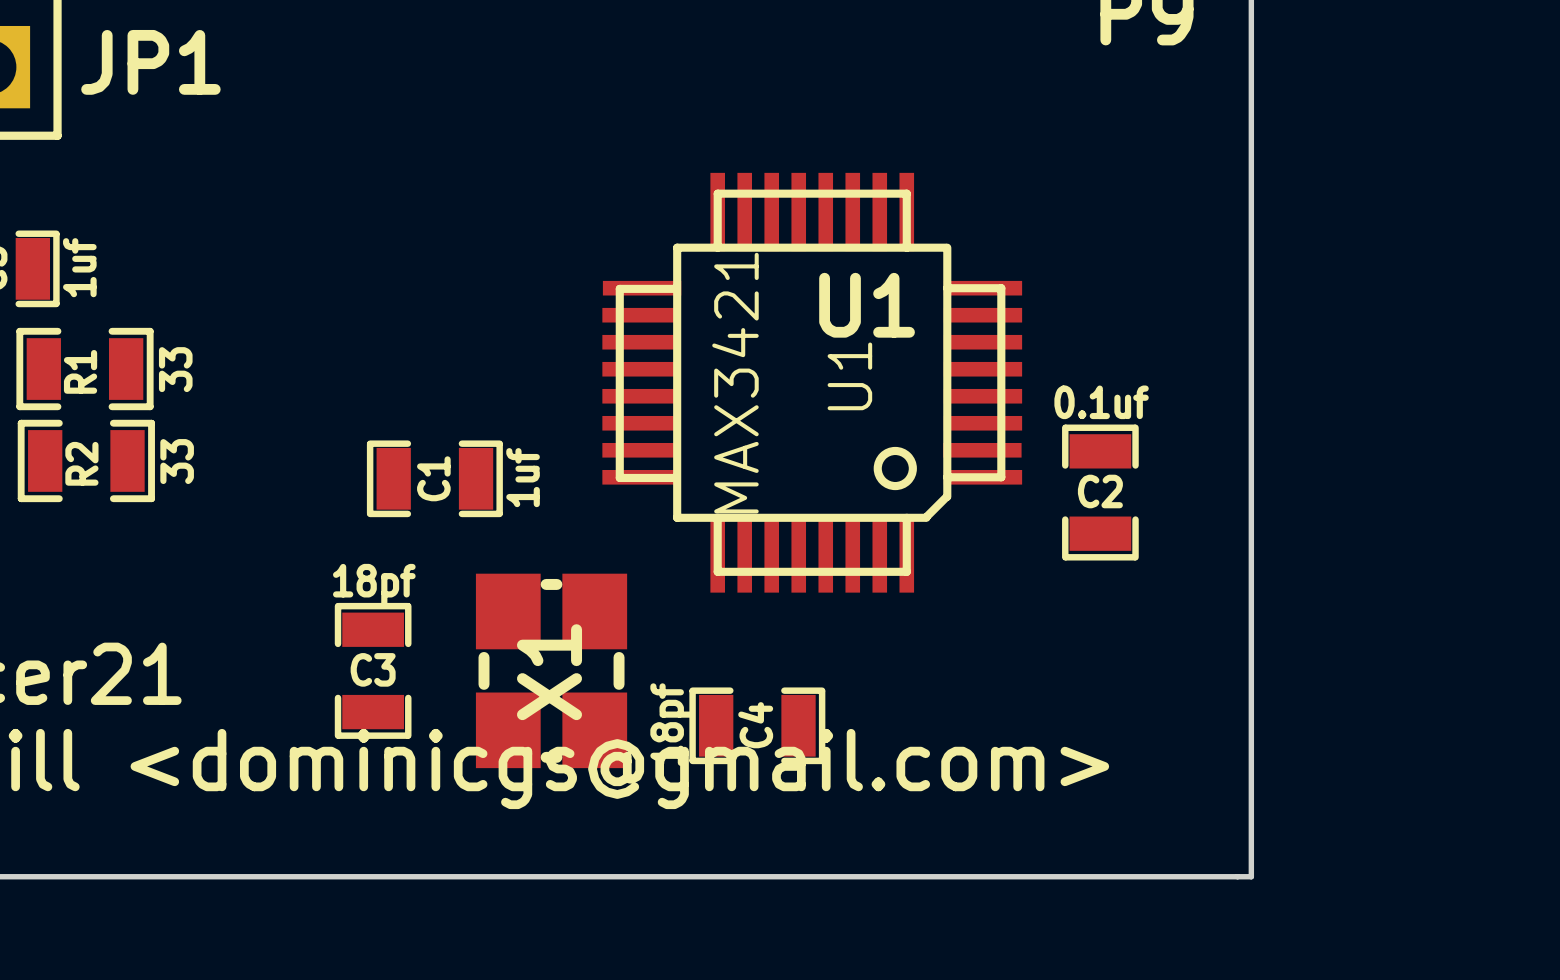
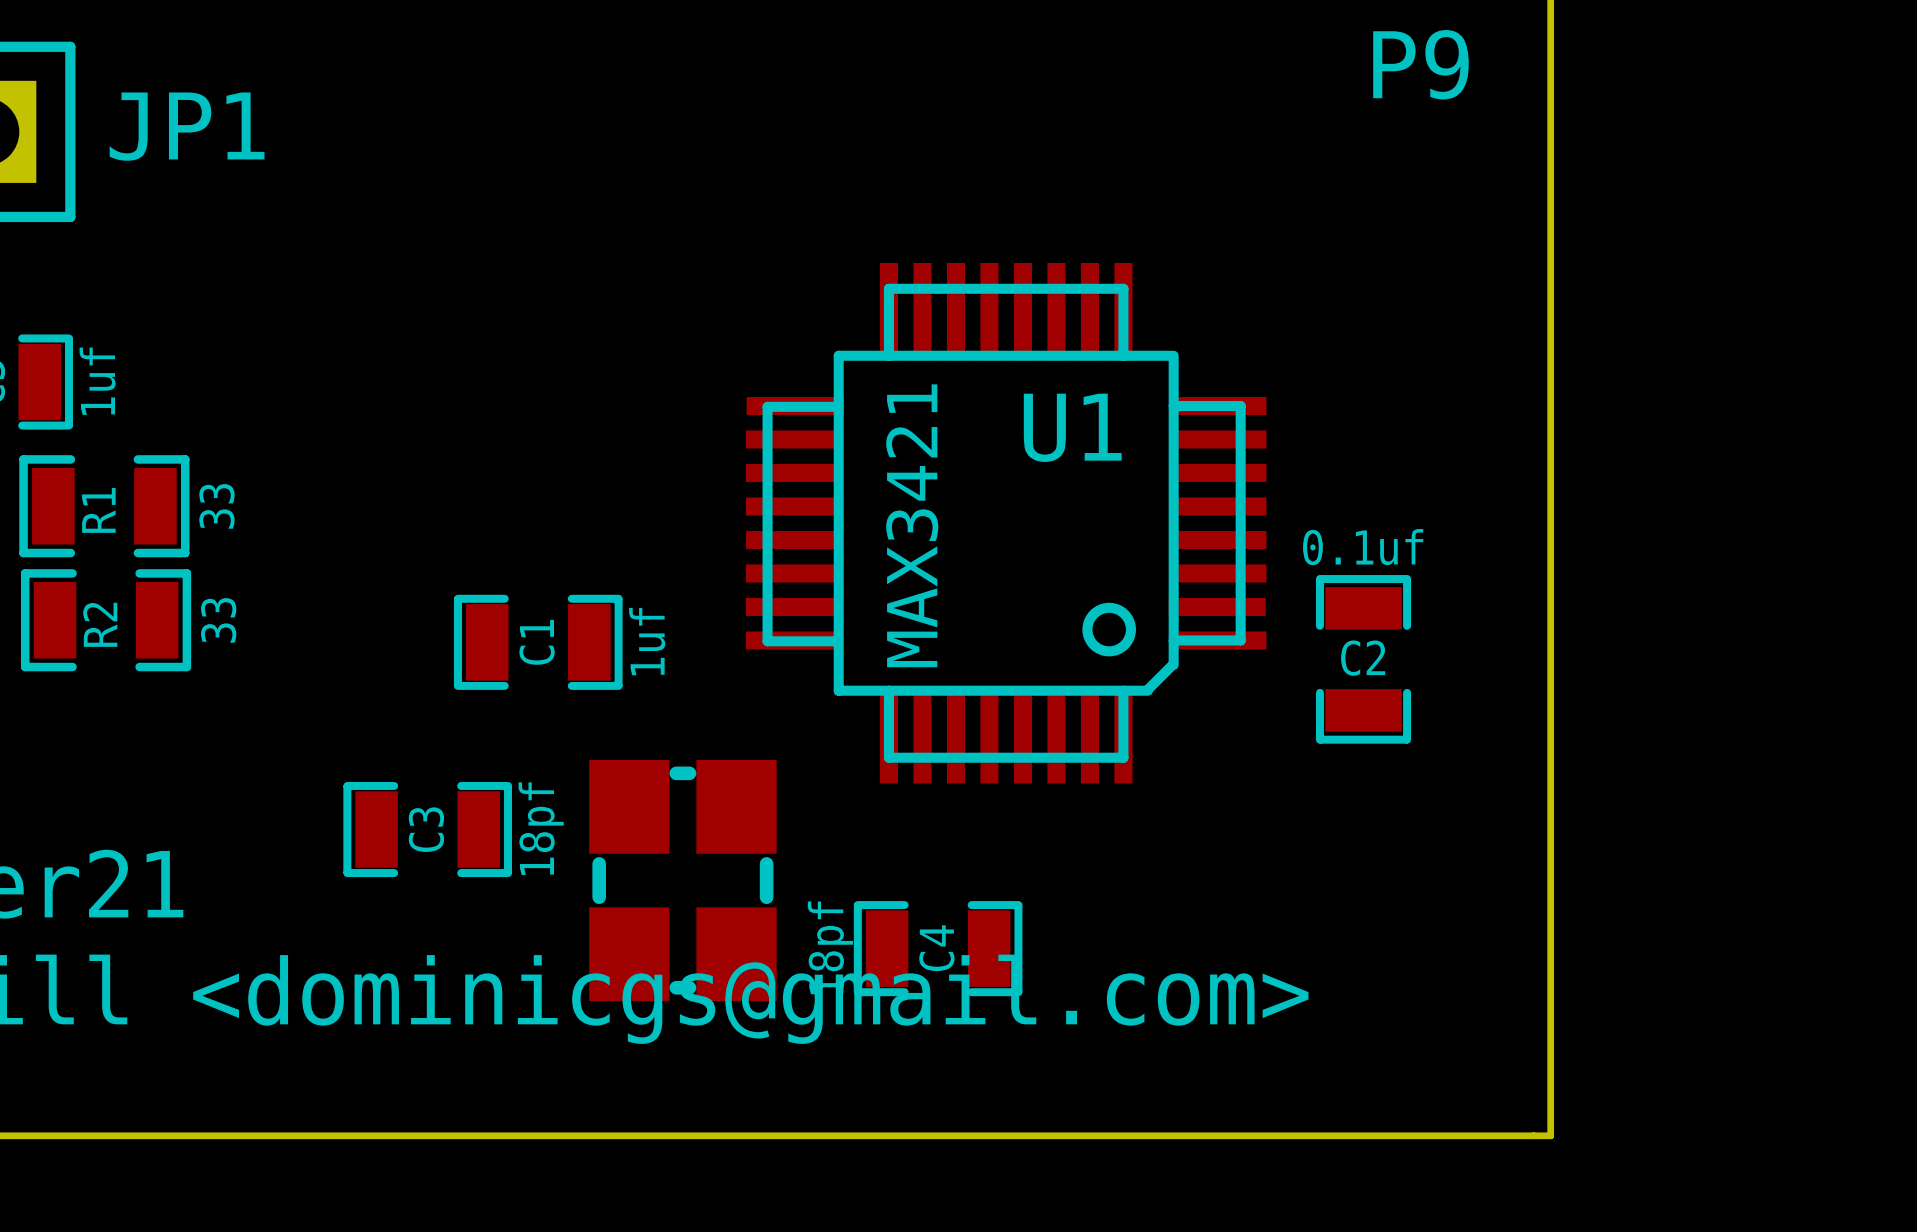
U1 name: U1 (849, 376) -> none
C3 rotation: 0° (373, 670) -> 90° clockwise (427, 829)
X1 name: X1 (549, 672) -> none

